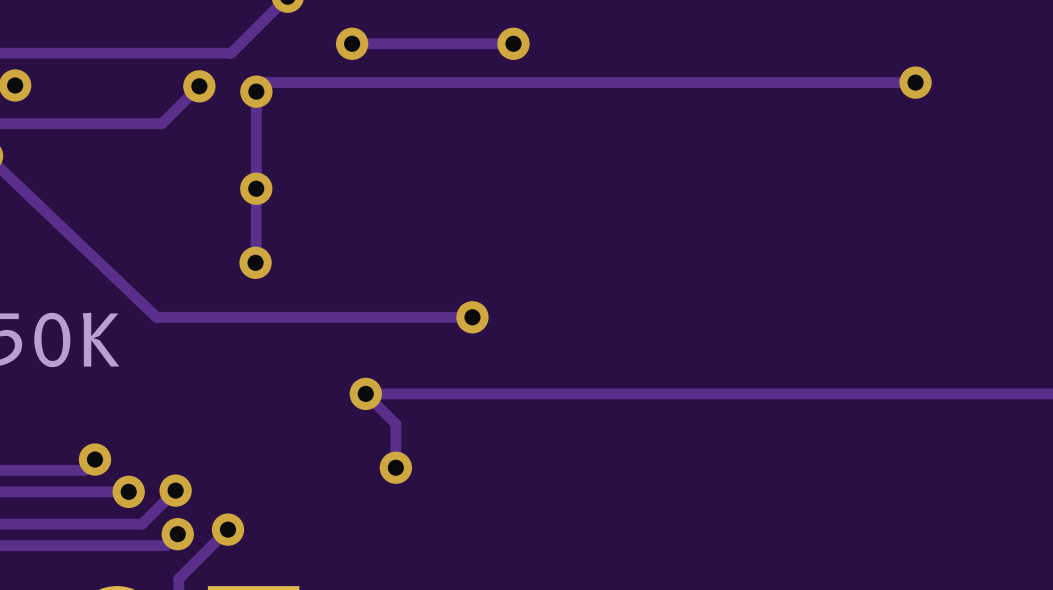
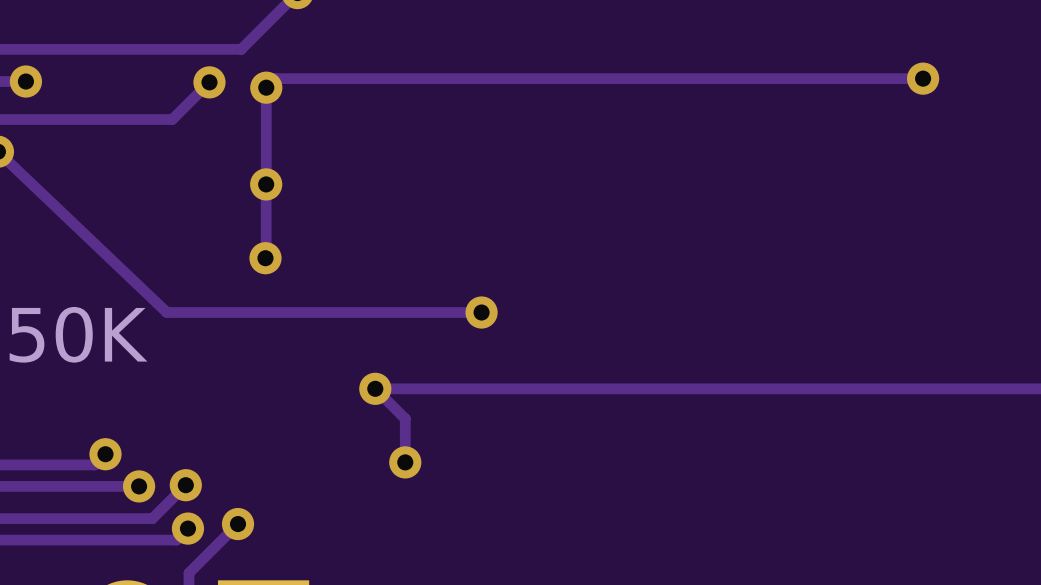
via: (352, 43) -> none
track: (513, 43) (352, 43) -> none
via: (513, 43) -> none

